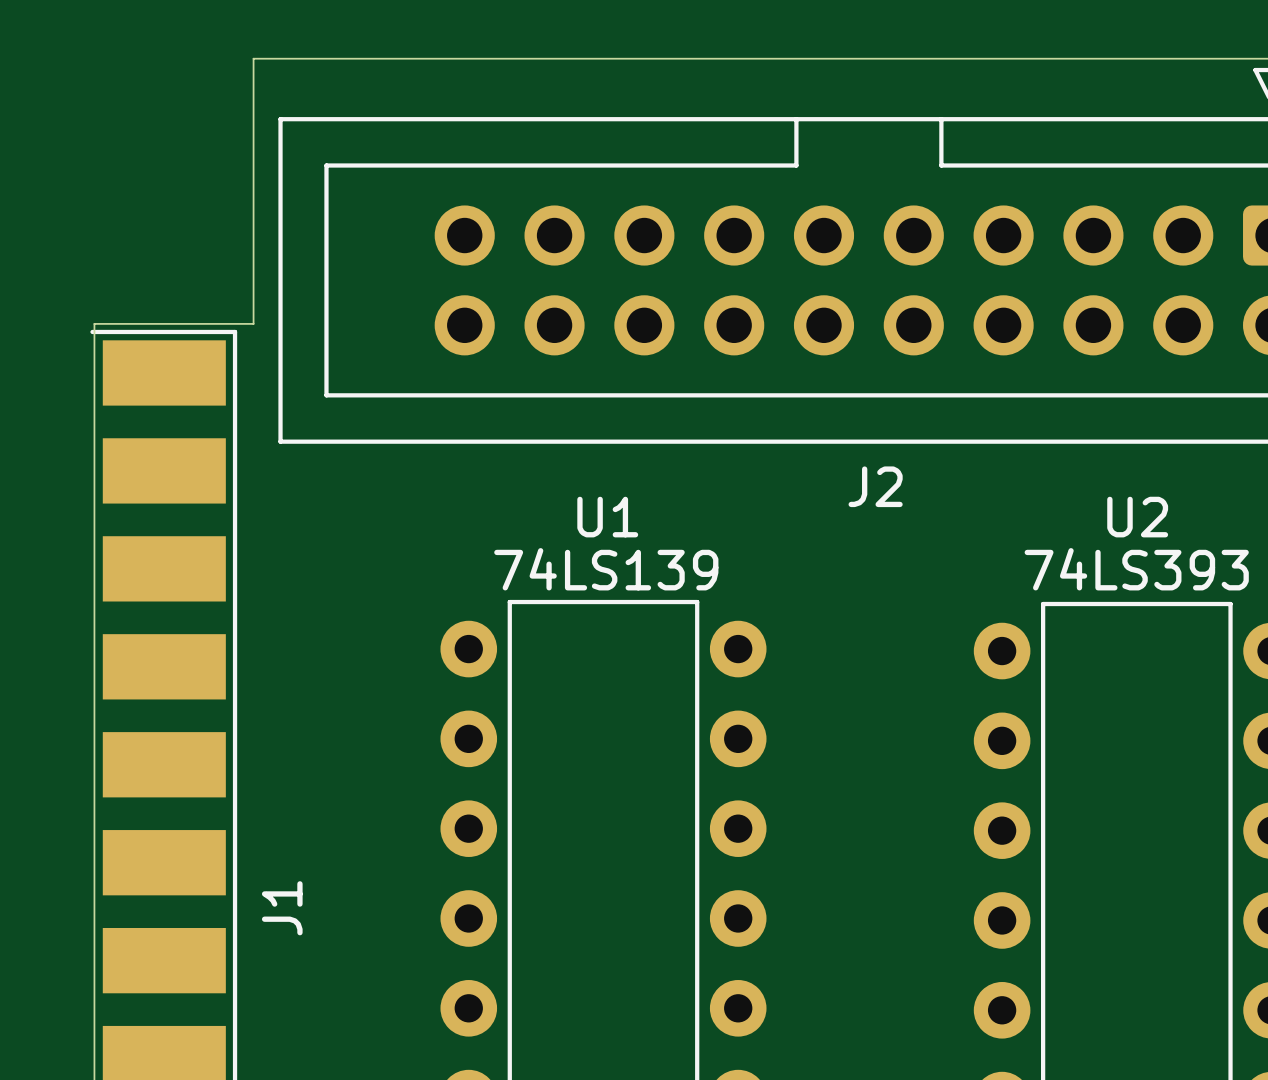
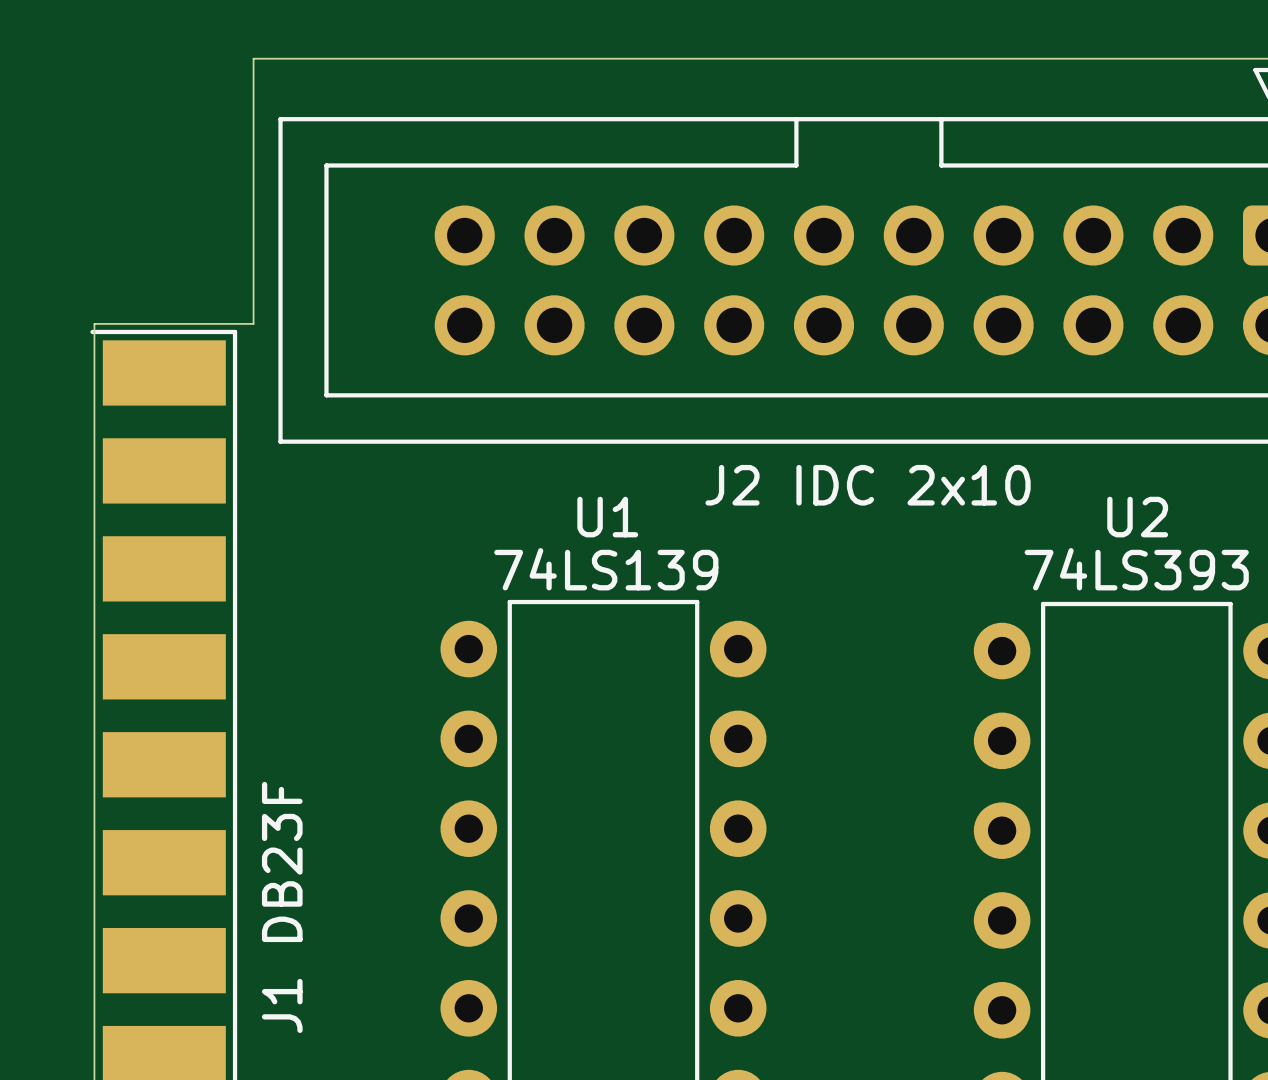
J2 text: none -> J2 IDC 2x10 (868, 485)
J2 name: J2 (875, 486) -> none
J1 text: none -> J1 DB23F (282, 907)
J1 name: J1 (282, 908) -> none

